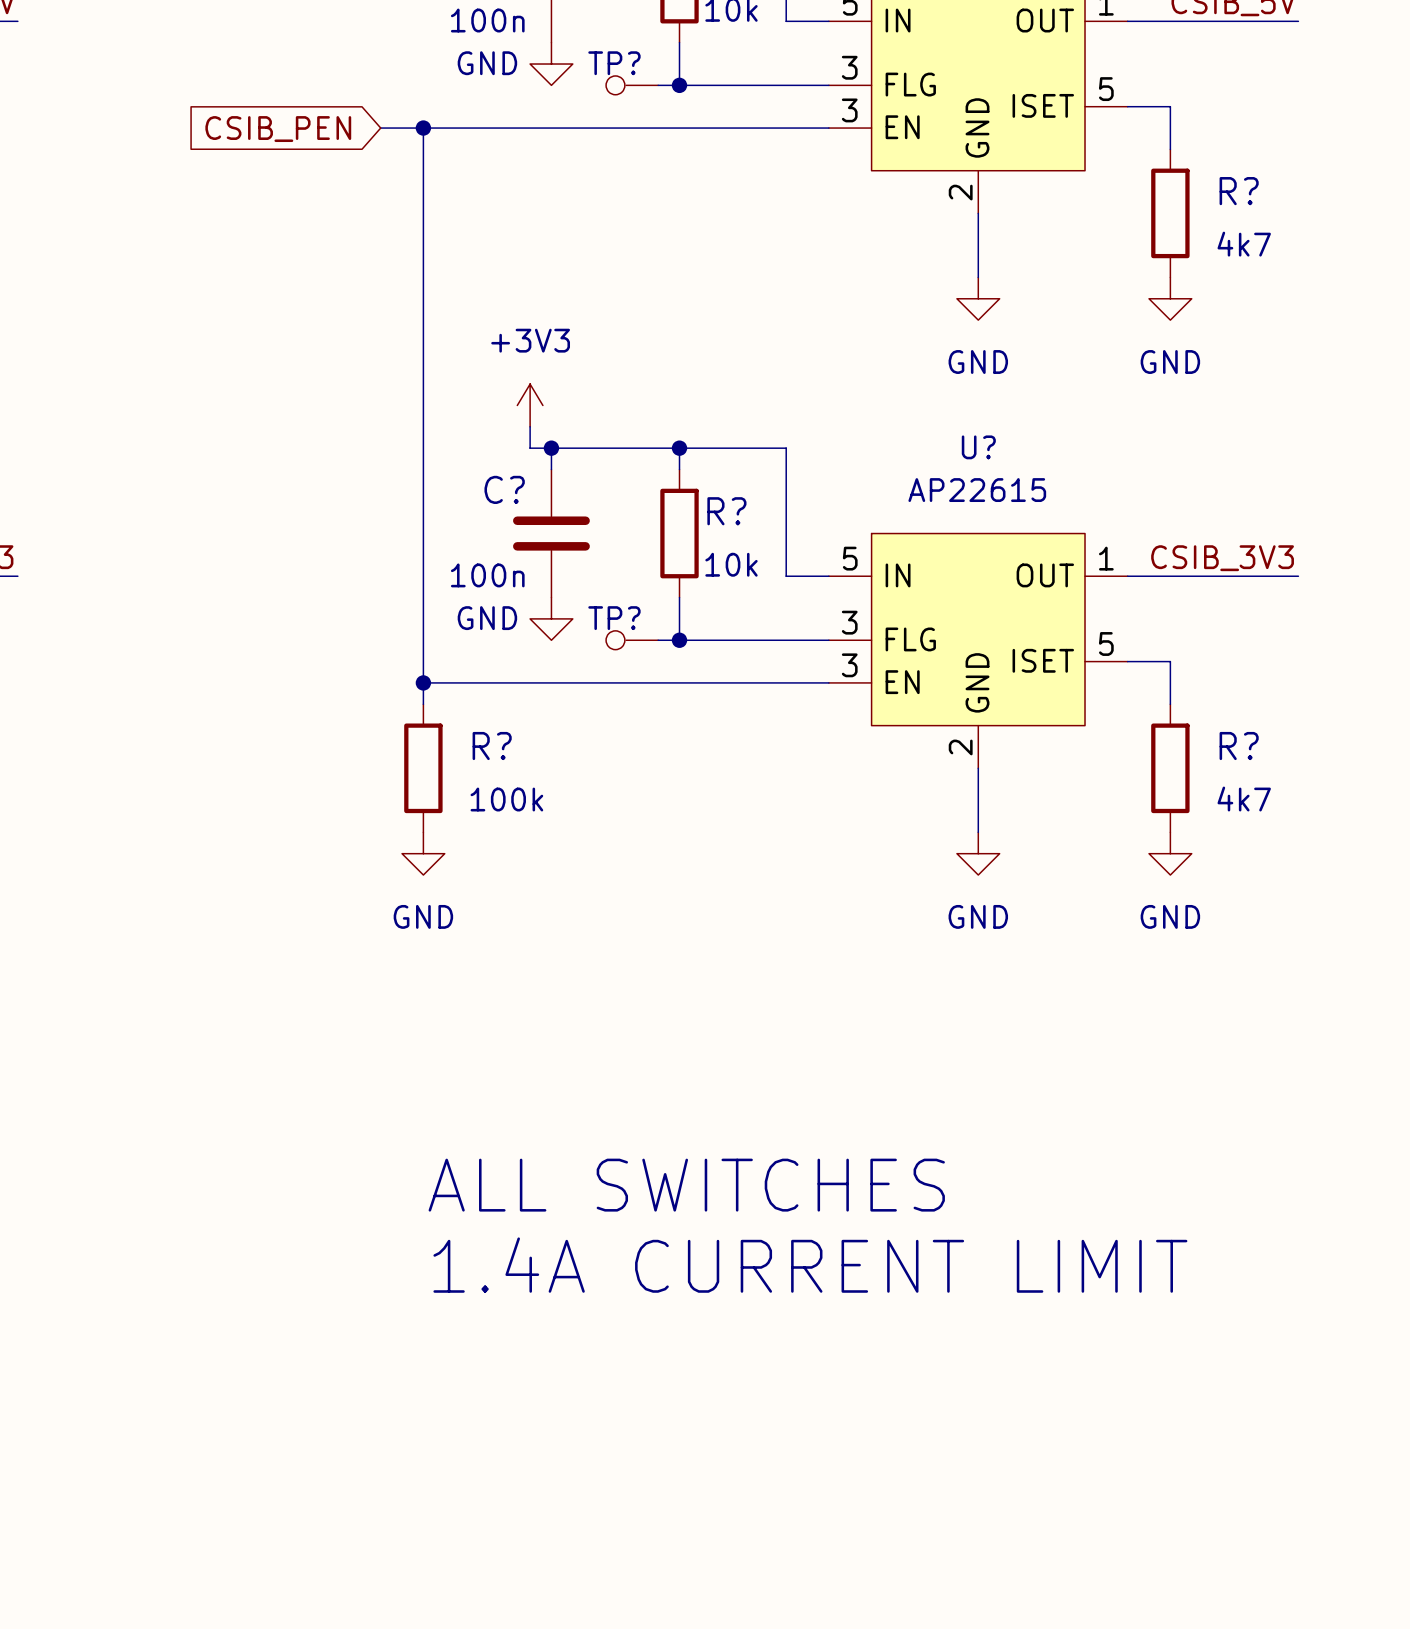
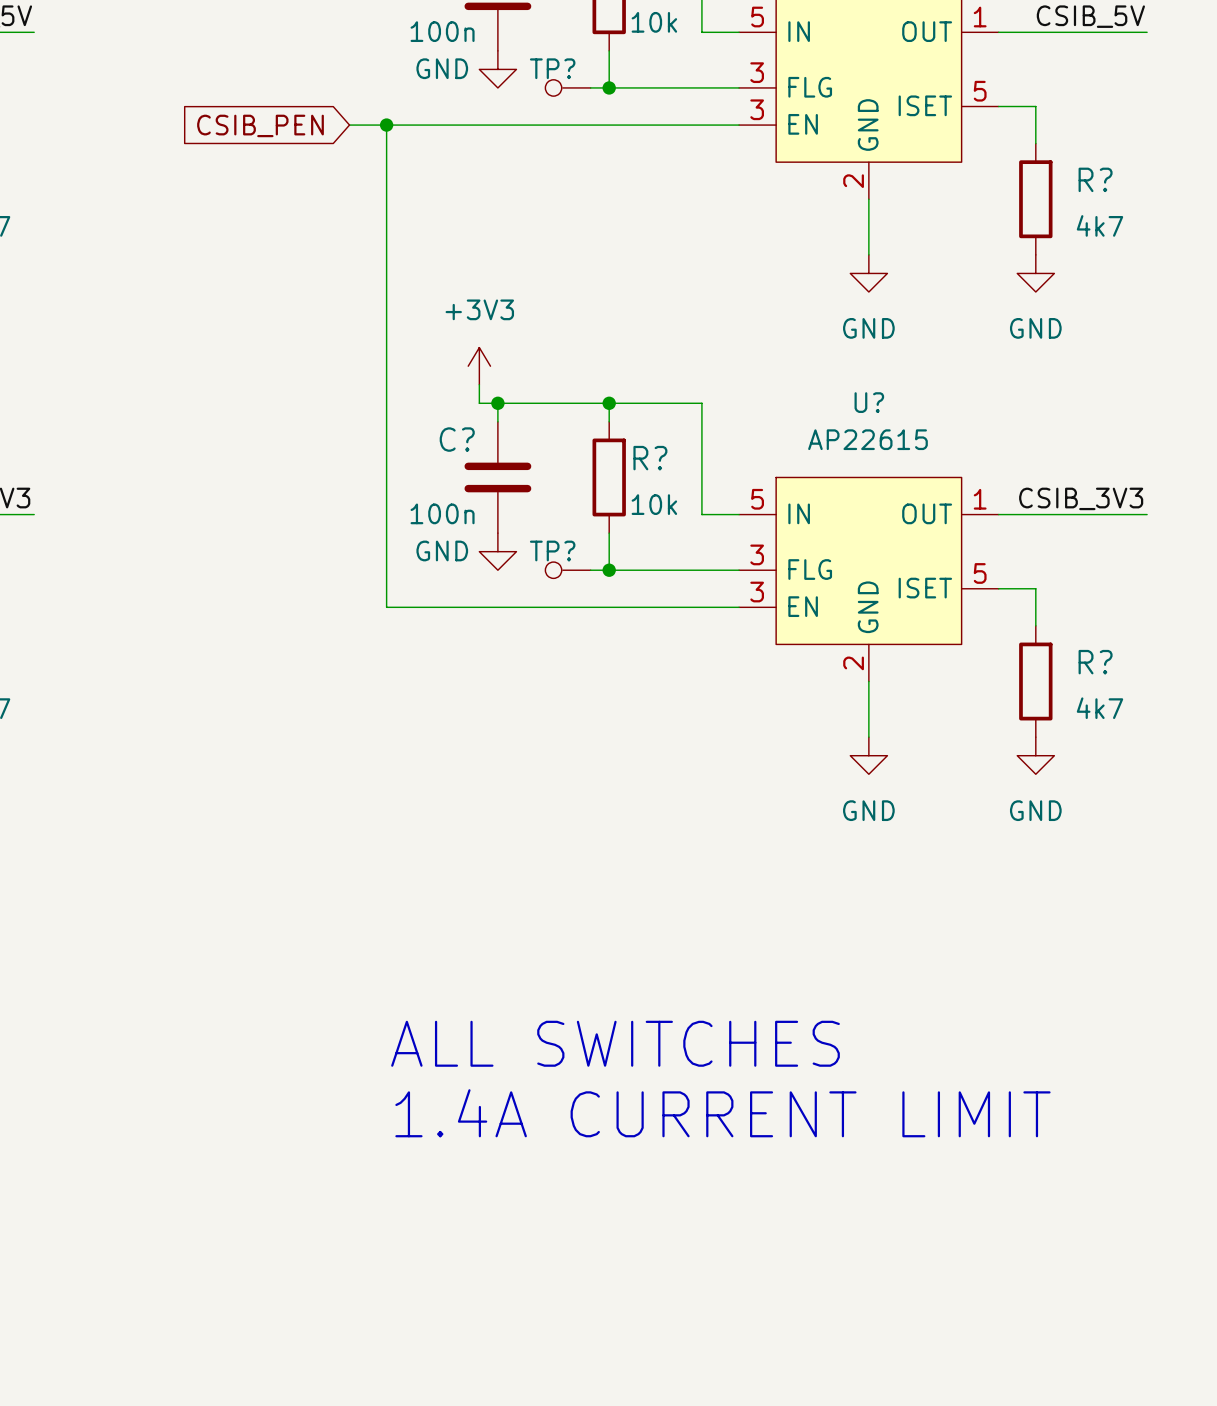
wire: (423, 682) (423, 704) -> none
junction: (423, 682) -> none
R?: (423, 768) -> none
power symbol: GND (423, 853) -> none

